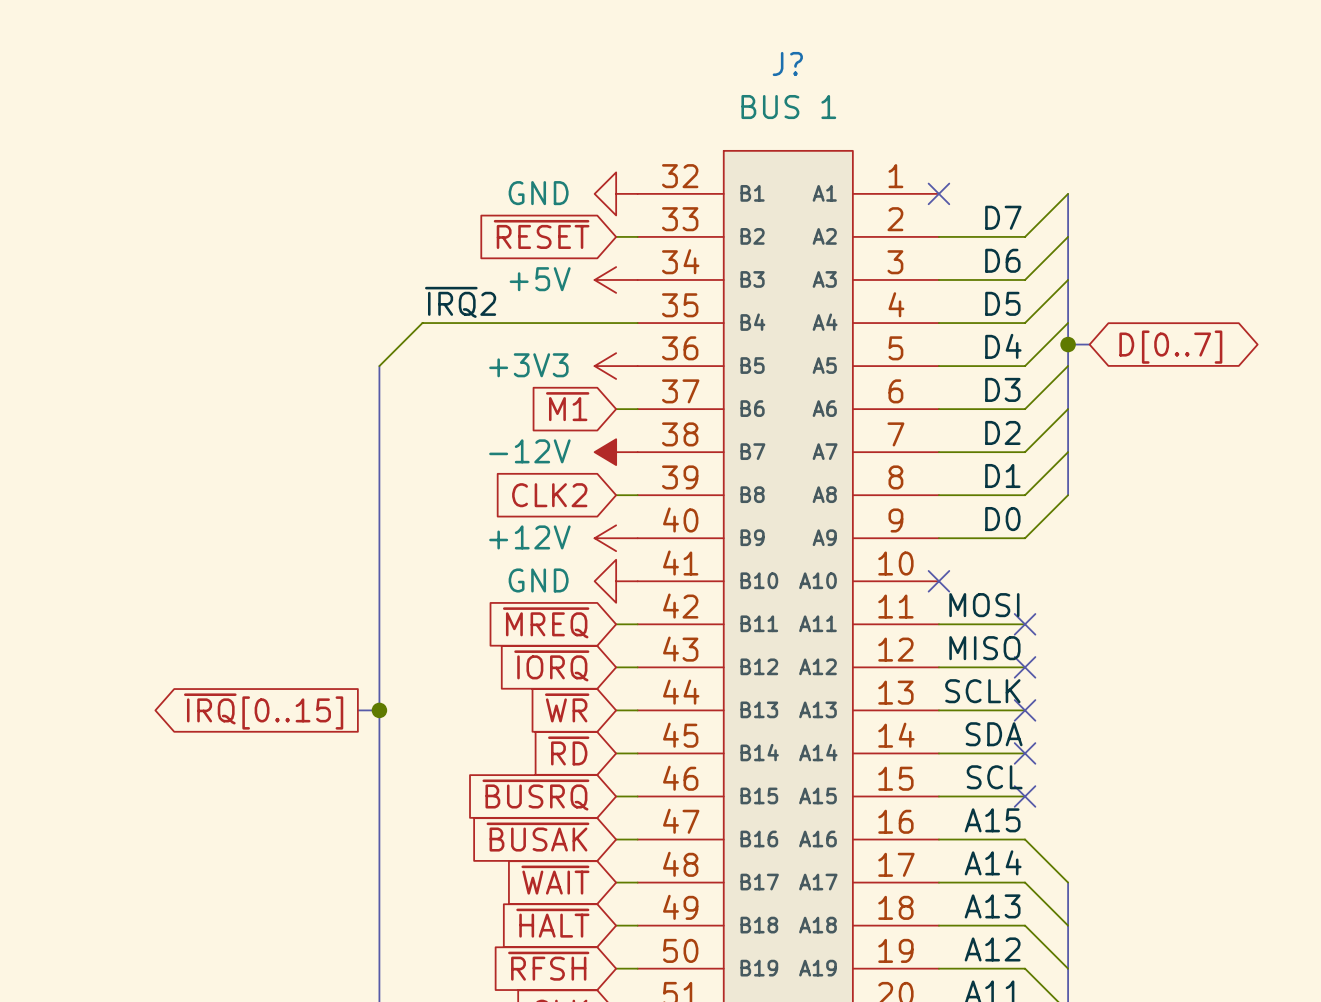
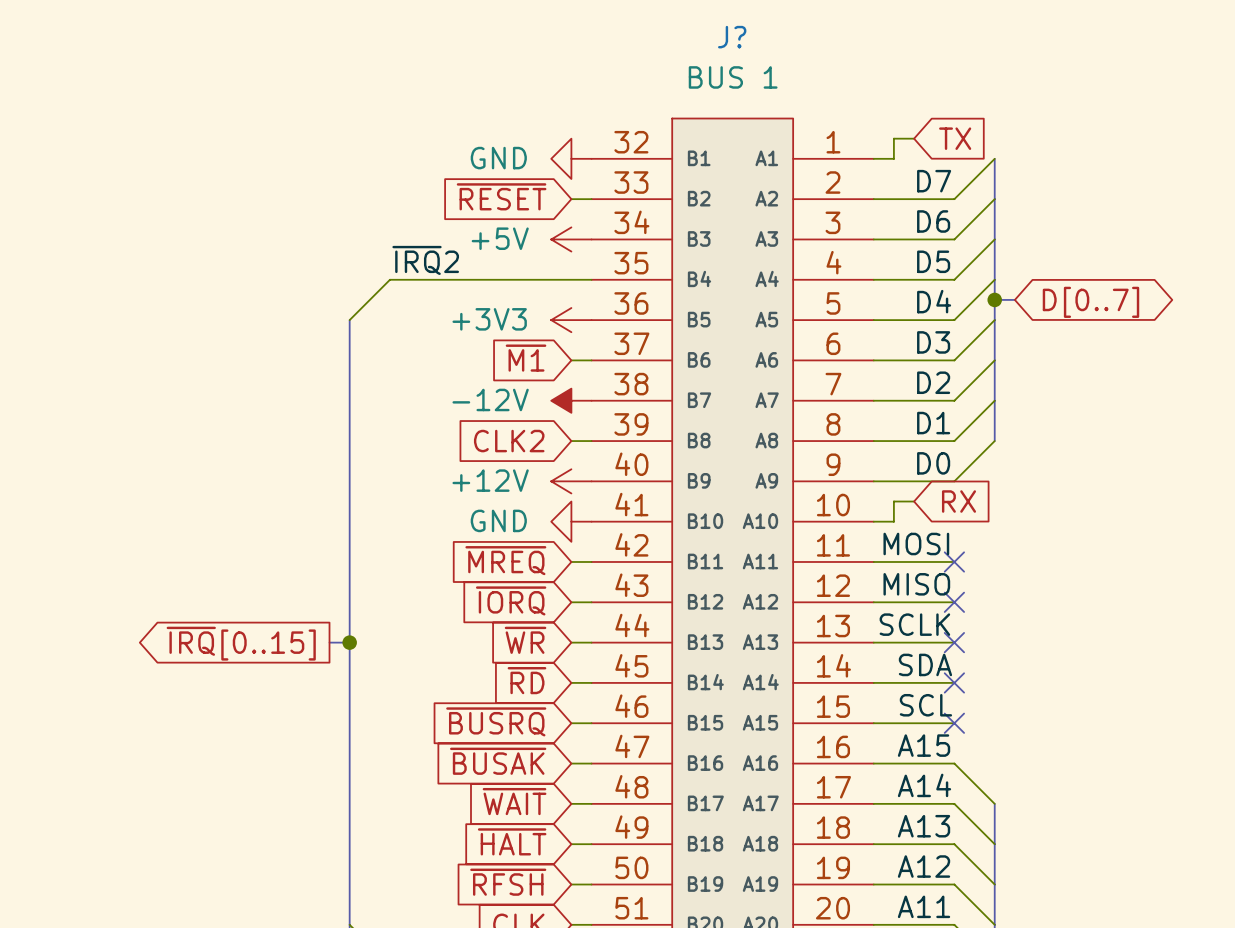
wire: none -> (914, 138) (893, 138) (893, 158) (873, 158)
global label: none -> TX (955, 138)
no-connect mark: (938, 193) -> none
wire: none -> (914, 501) (893, 501) (893, 521) (873, 521)
global label: none -> RX (958, 501)
no-connect mark: (938, 581) -> none

